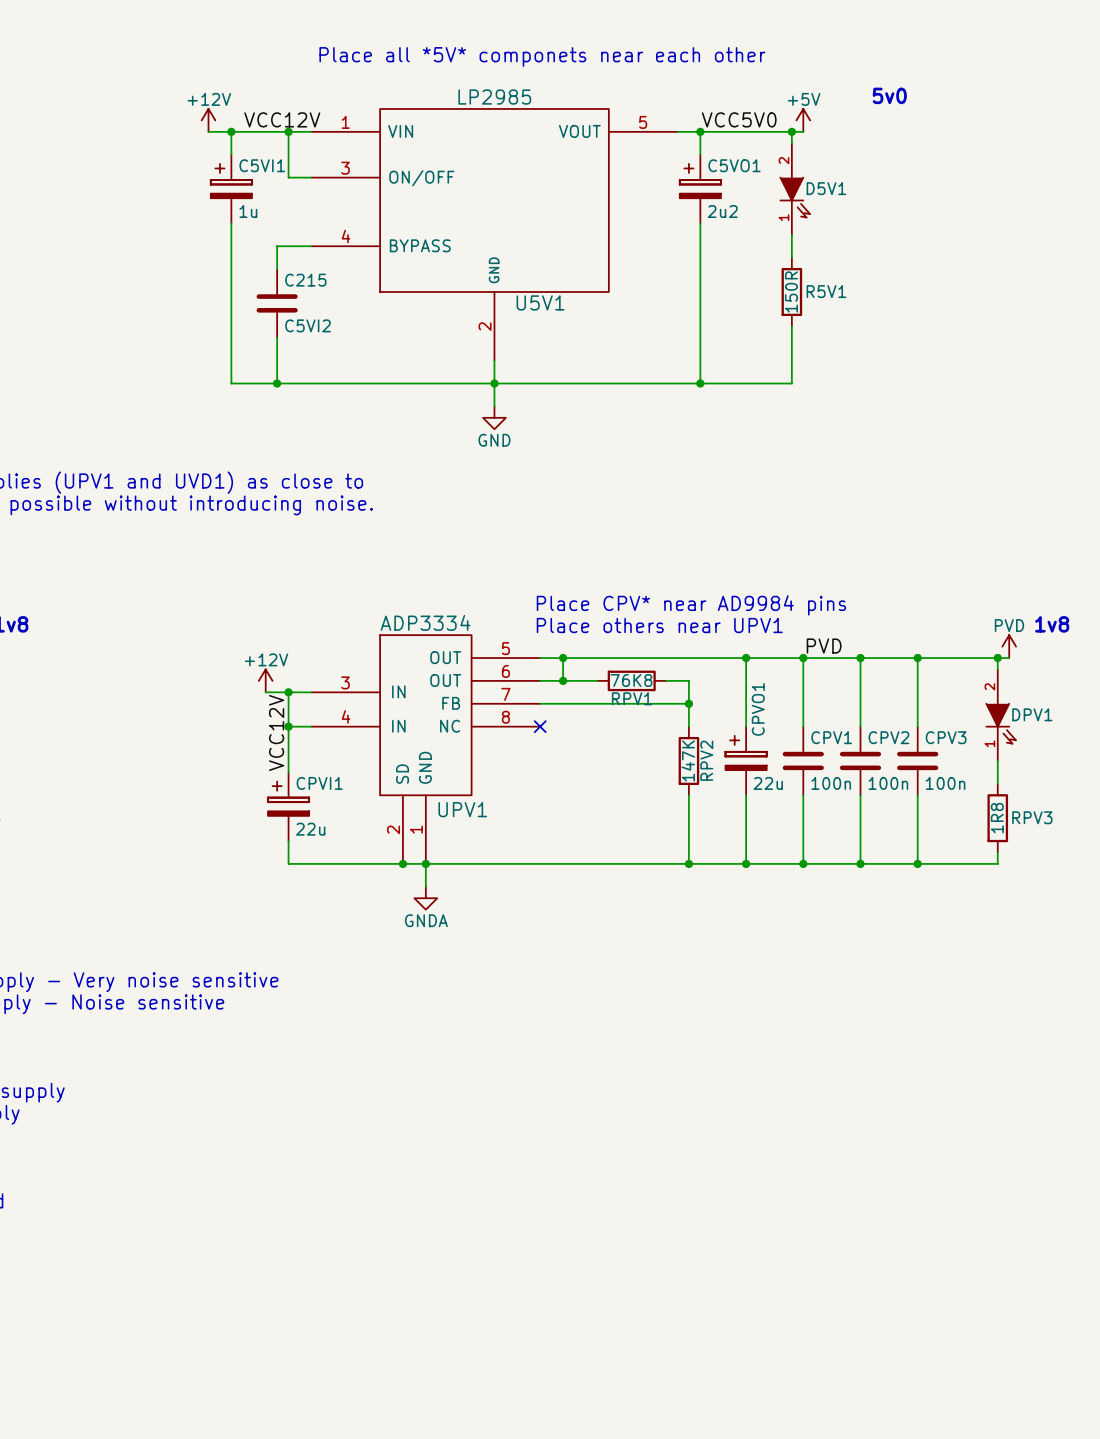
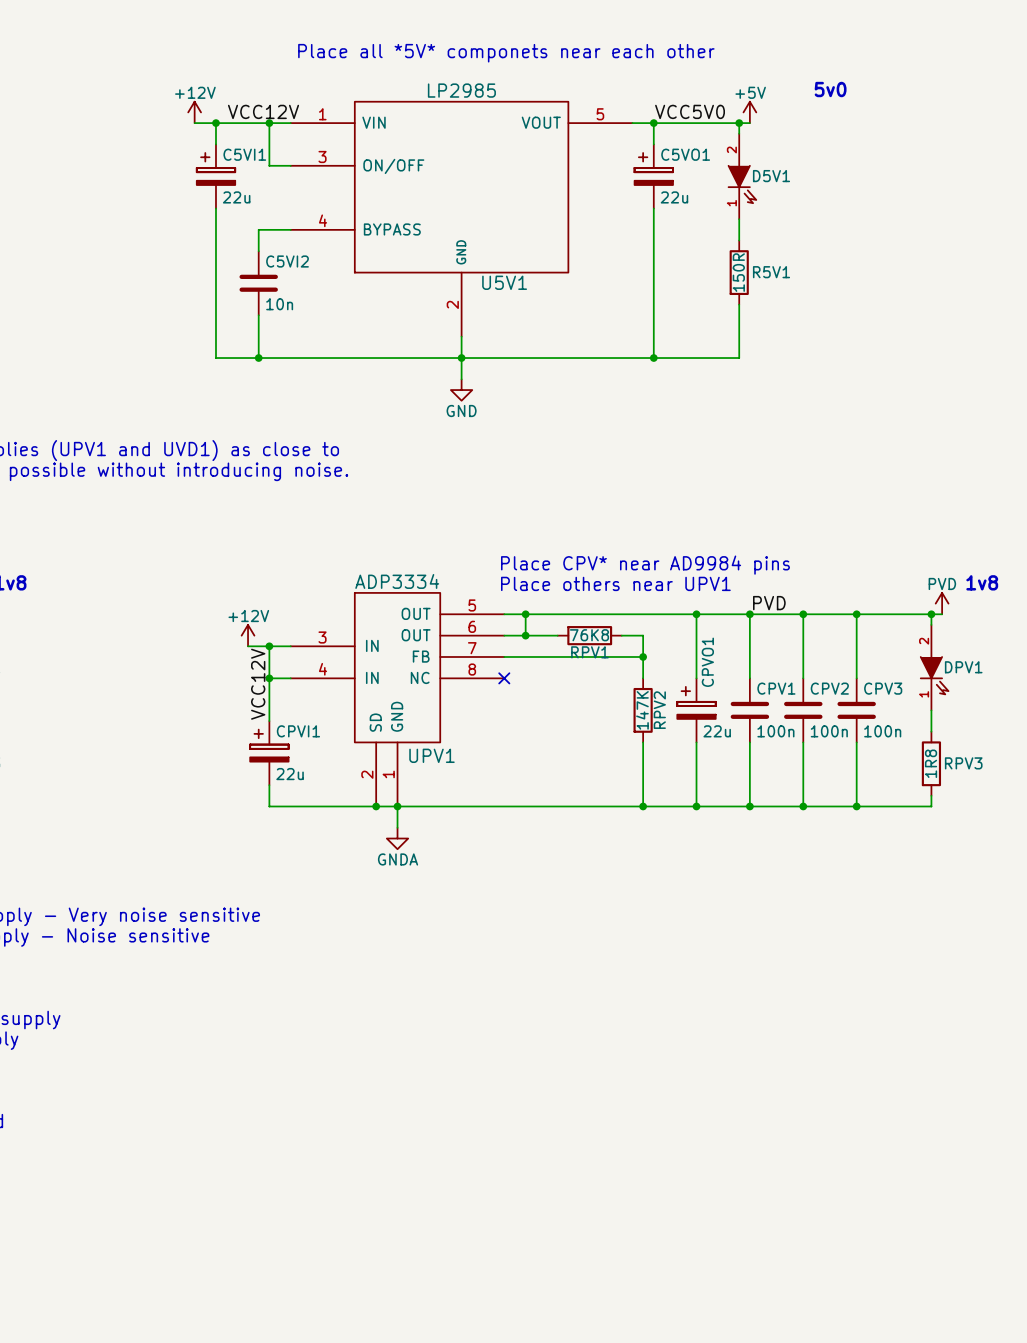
C5VI1 value: 1u (248, 211) -> 22u (236, 197)
C5VO1 value: 2u2 (722, 211) -> 22u (674, 197)
C215 name: C215 (305, 280) -> C5VI2 (287, 261)
C215 value: C5VI2 (307, 325) -> 10n (279, 304)

